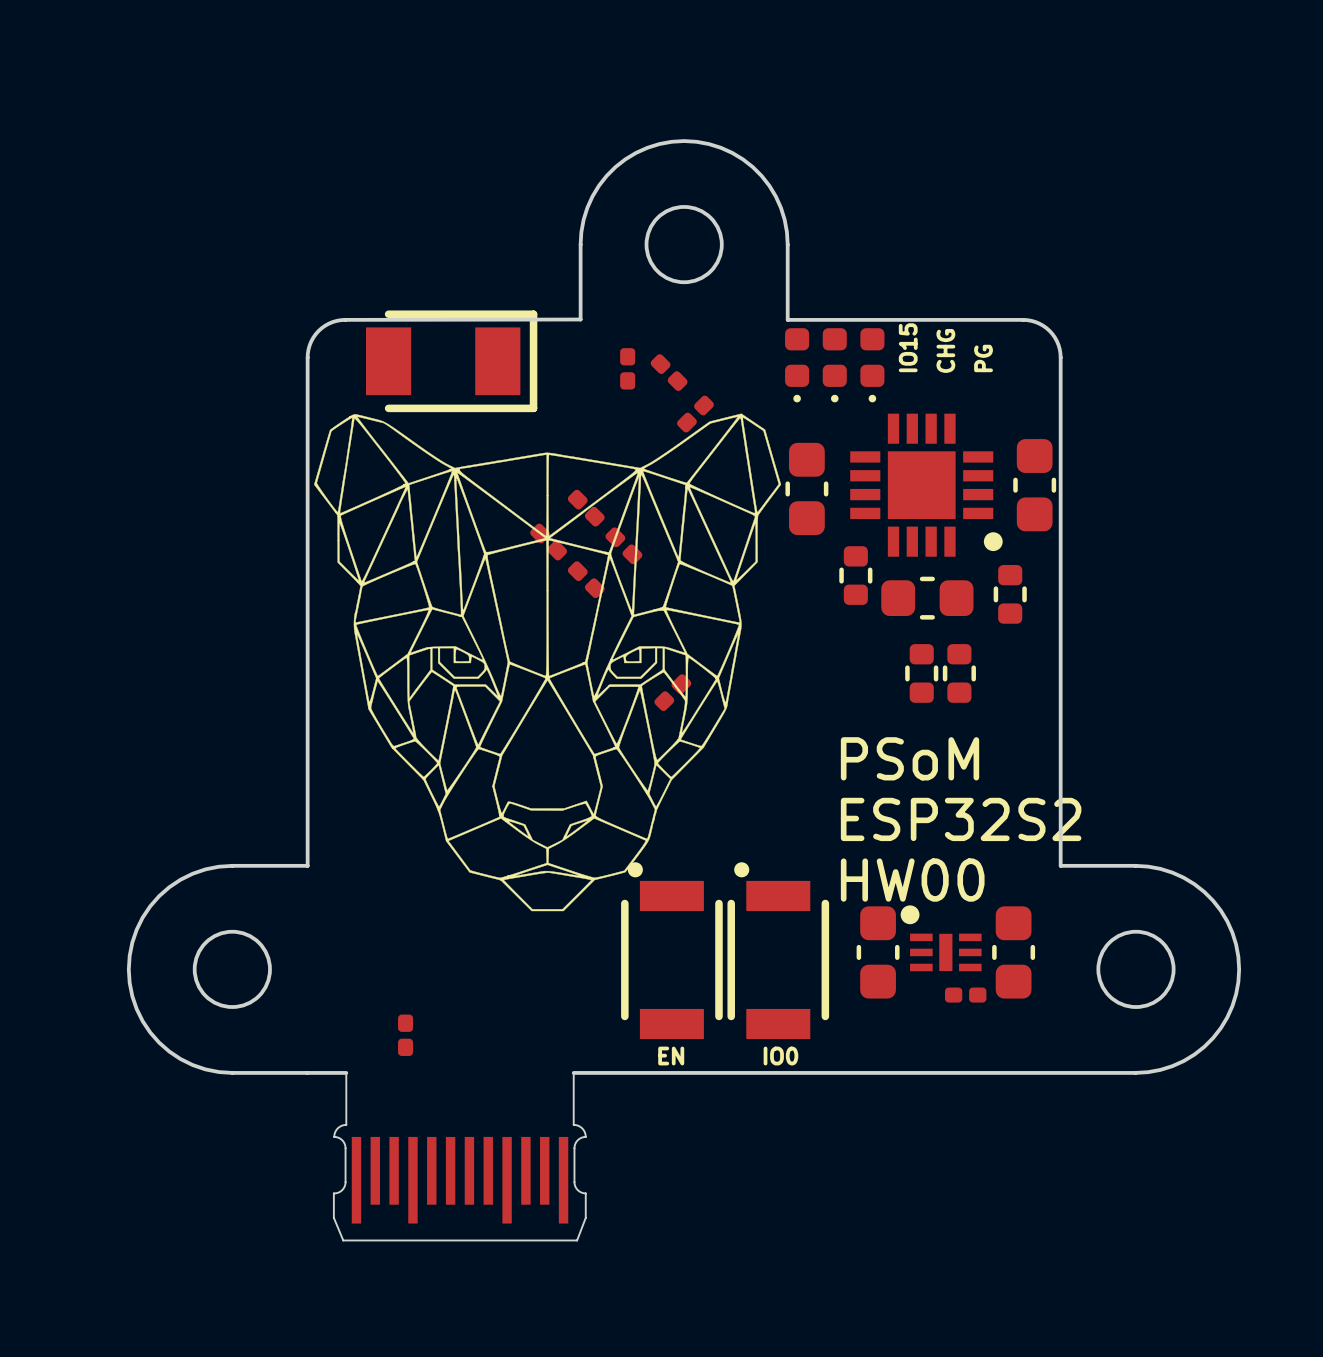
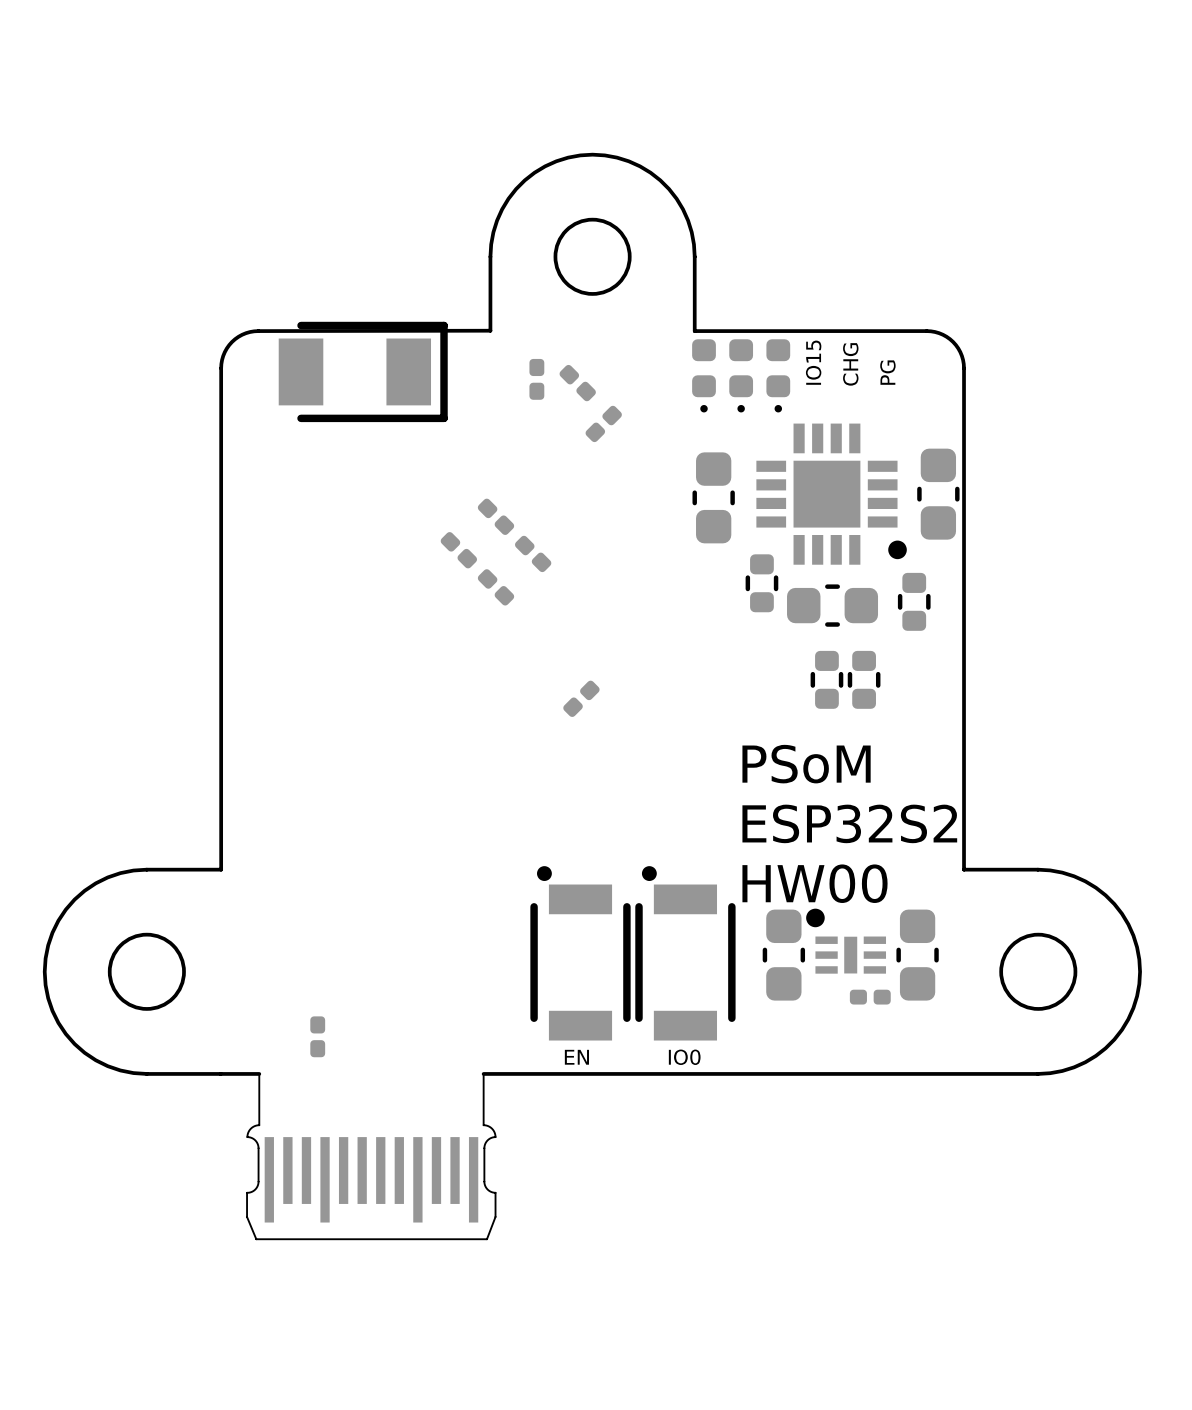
drawing: [314, 413, 782, 912] -> none

